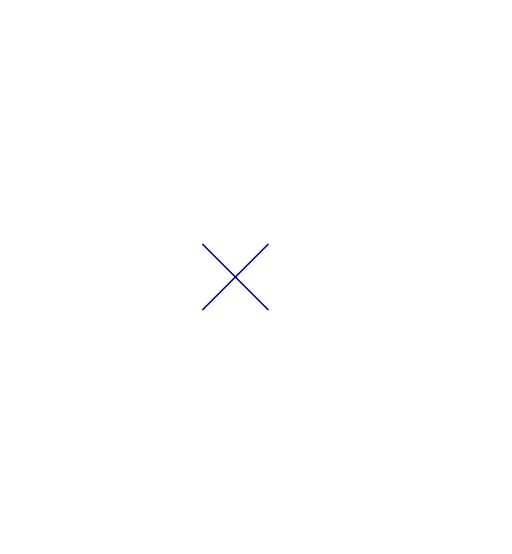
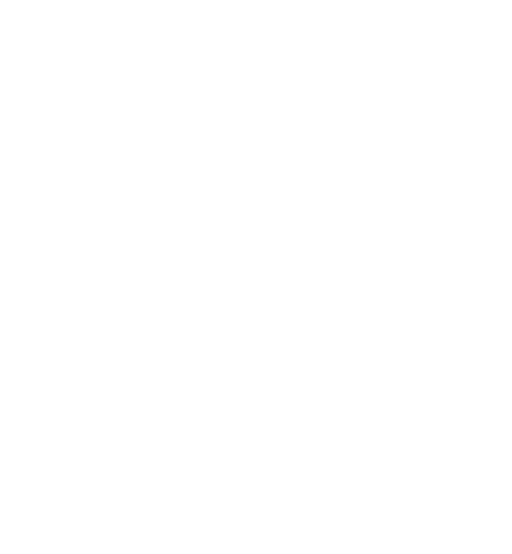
no-connect mark: (235, 277) -> none

